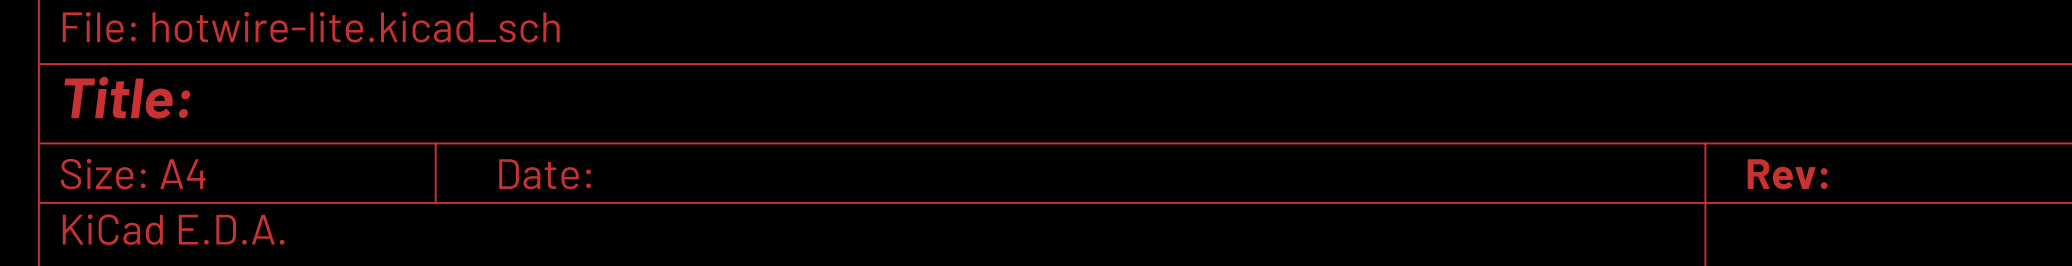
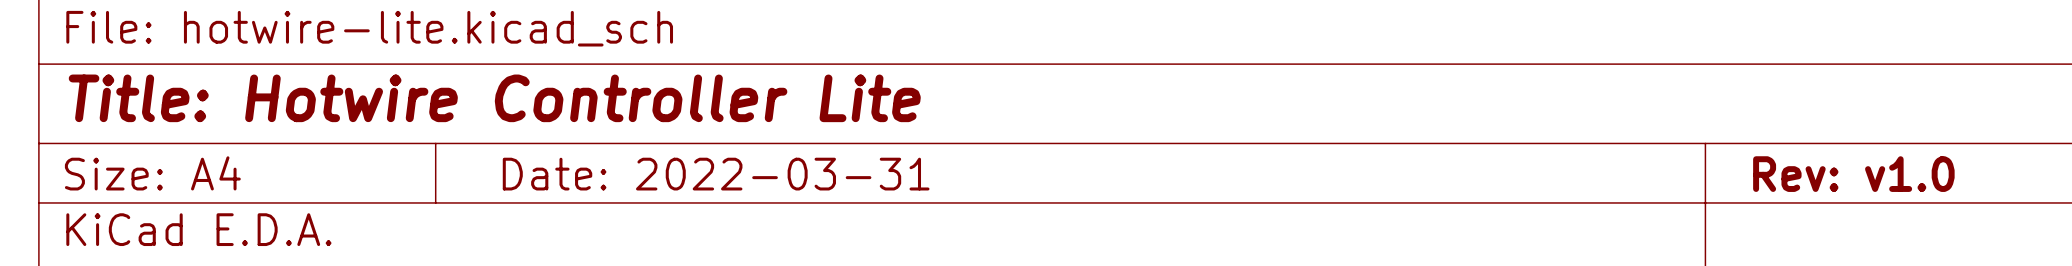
title block: Title: (127, 97) -> Title: Hotwire Controller Lite (494, 98)
title block: Date: (545, 174) -> Date: 2022-03-31 (716, 174)
title block: Rev: (1787, 174) -> Rev: v1.0 (1853, 174)

